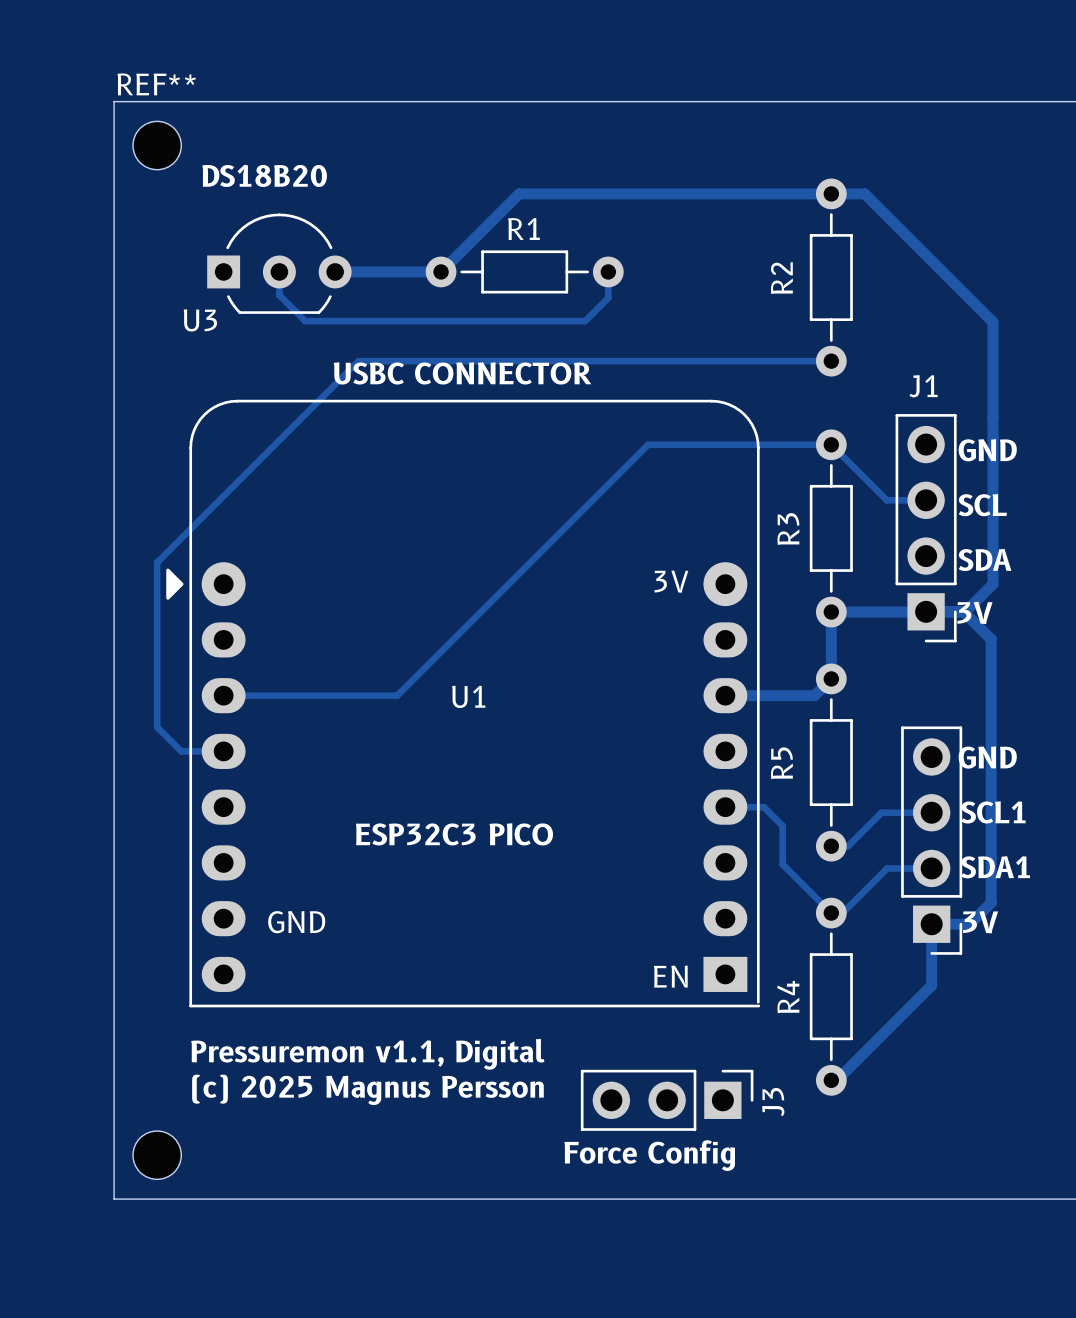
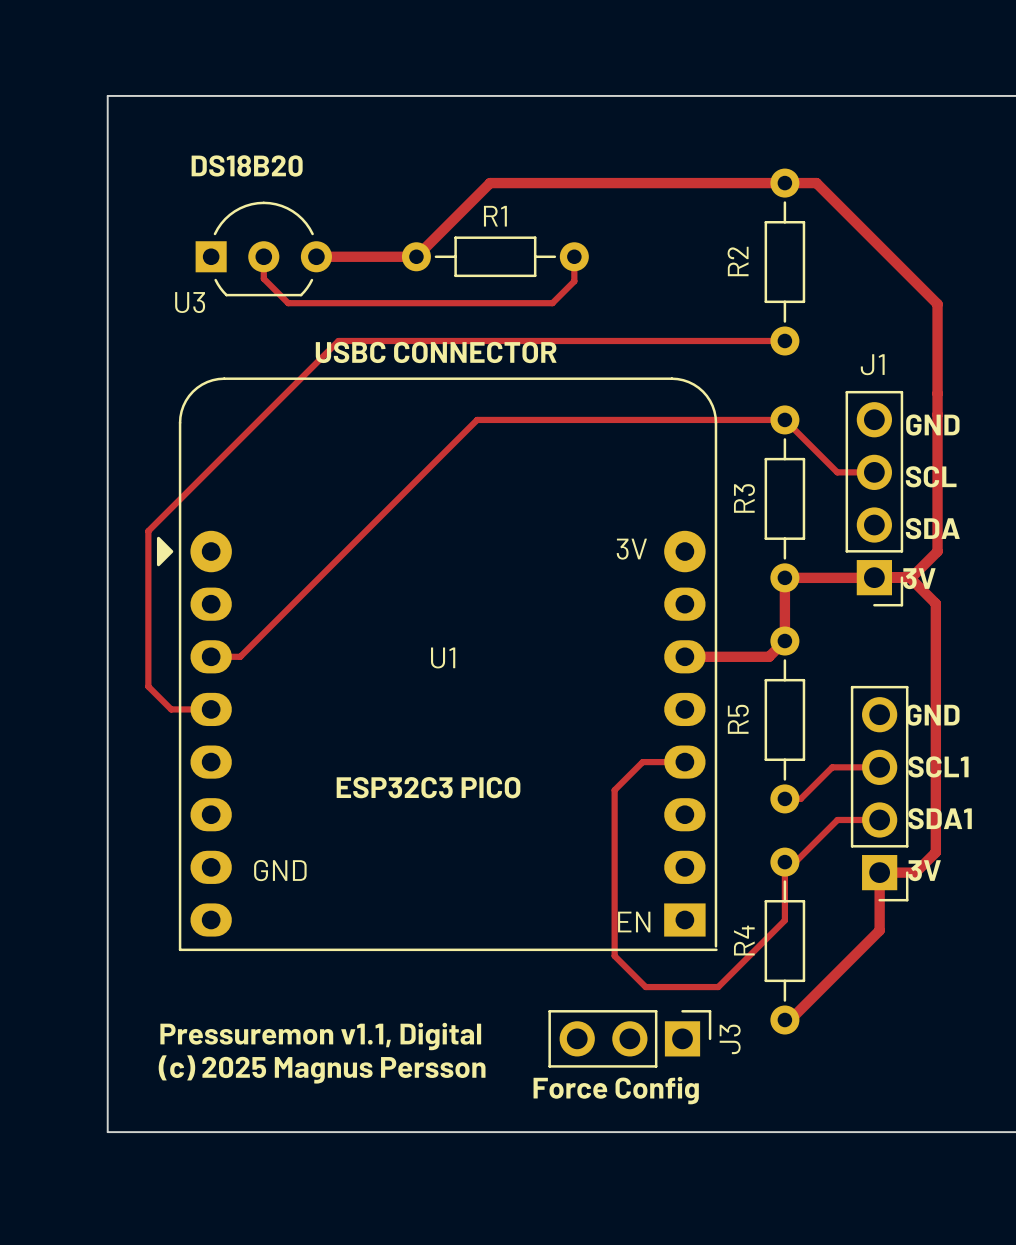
REF**: (157, 145) -> none
track: (648, 444) (397, 695) (254, 695) -> (611, 419) (477, 419) (240, 656)
track: (725, 807) (763, 807) (782, 825) (782, 864) (831, 913) -> (684, 762) (642, 762) (614, 790) (614, 955) (645, 987) (718, 987) (784, 920) (784, 862)
text position: Pressuremon v1.1, Digital (367, 1054) -> Pressuremon v1.1, Digital (320, 1036)
text position: (c) 2025 Magnus Persson (367, 1089) -> (c) 2025 Magnus Persson (322, 1069)
part: (157, 1155) -> none

